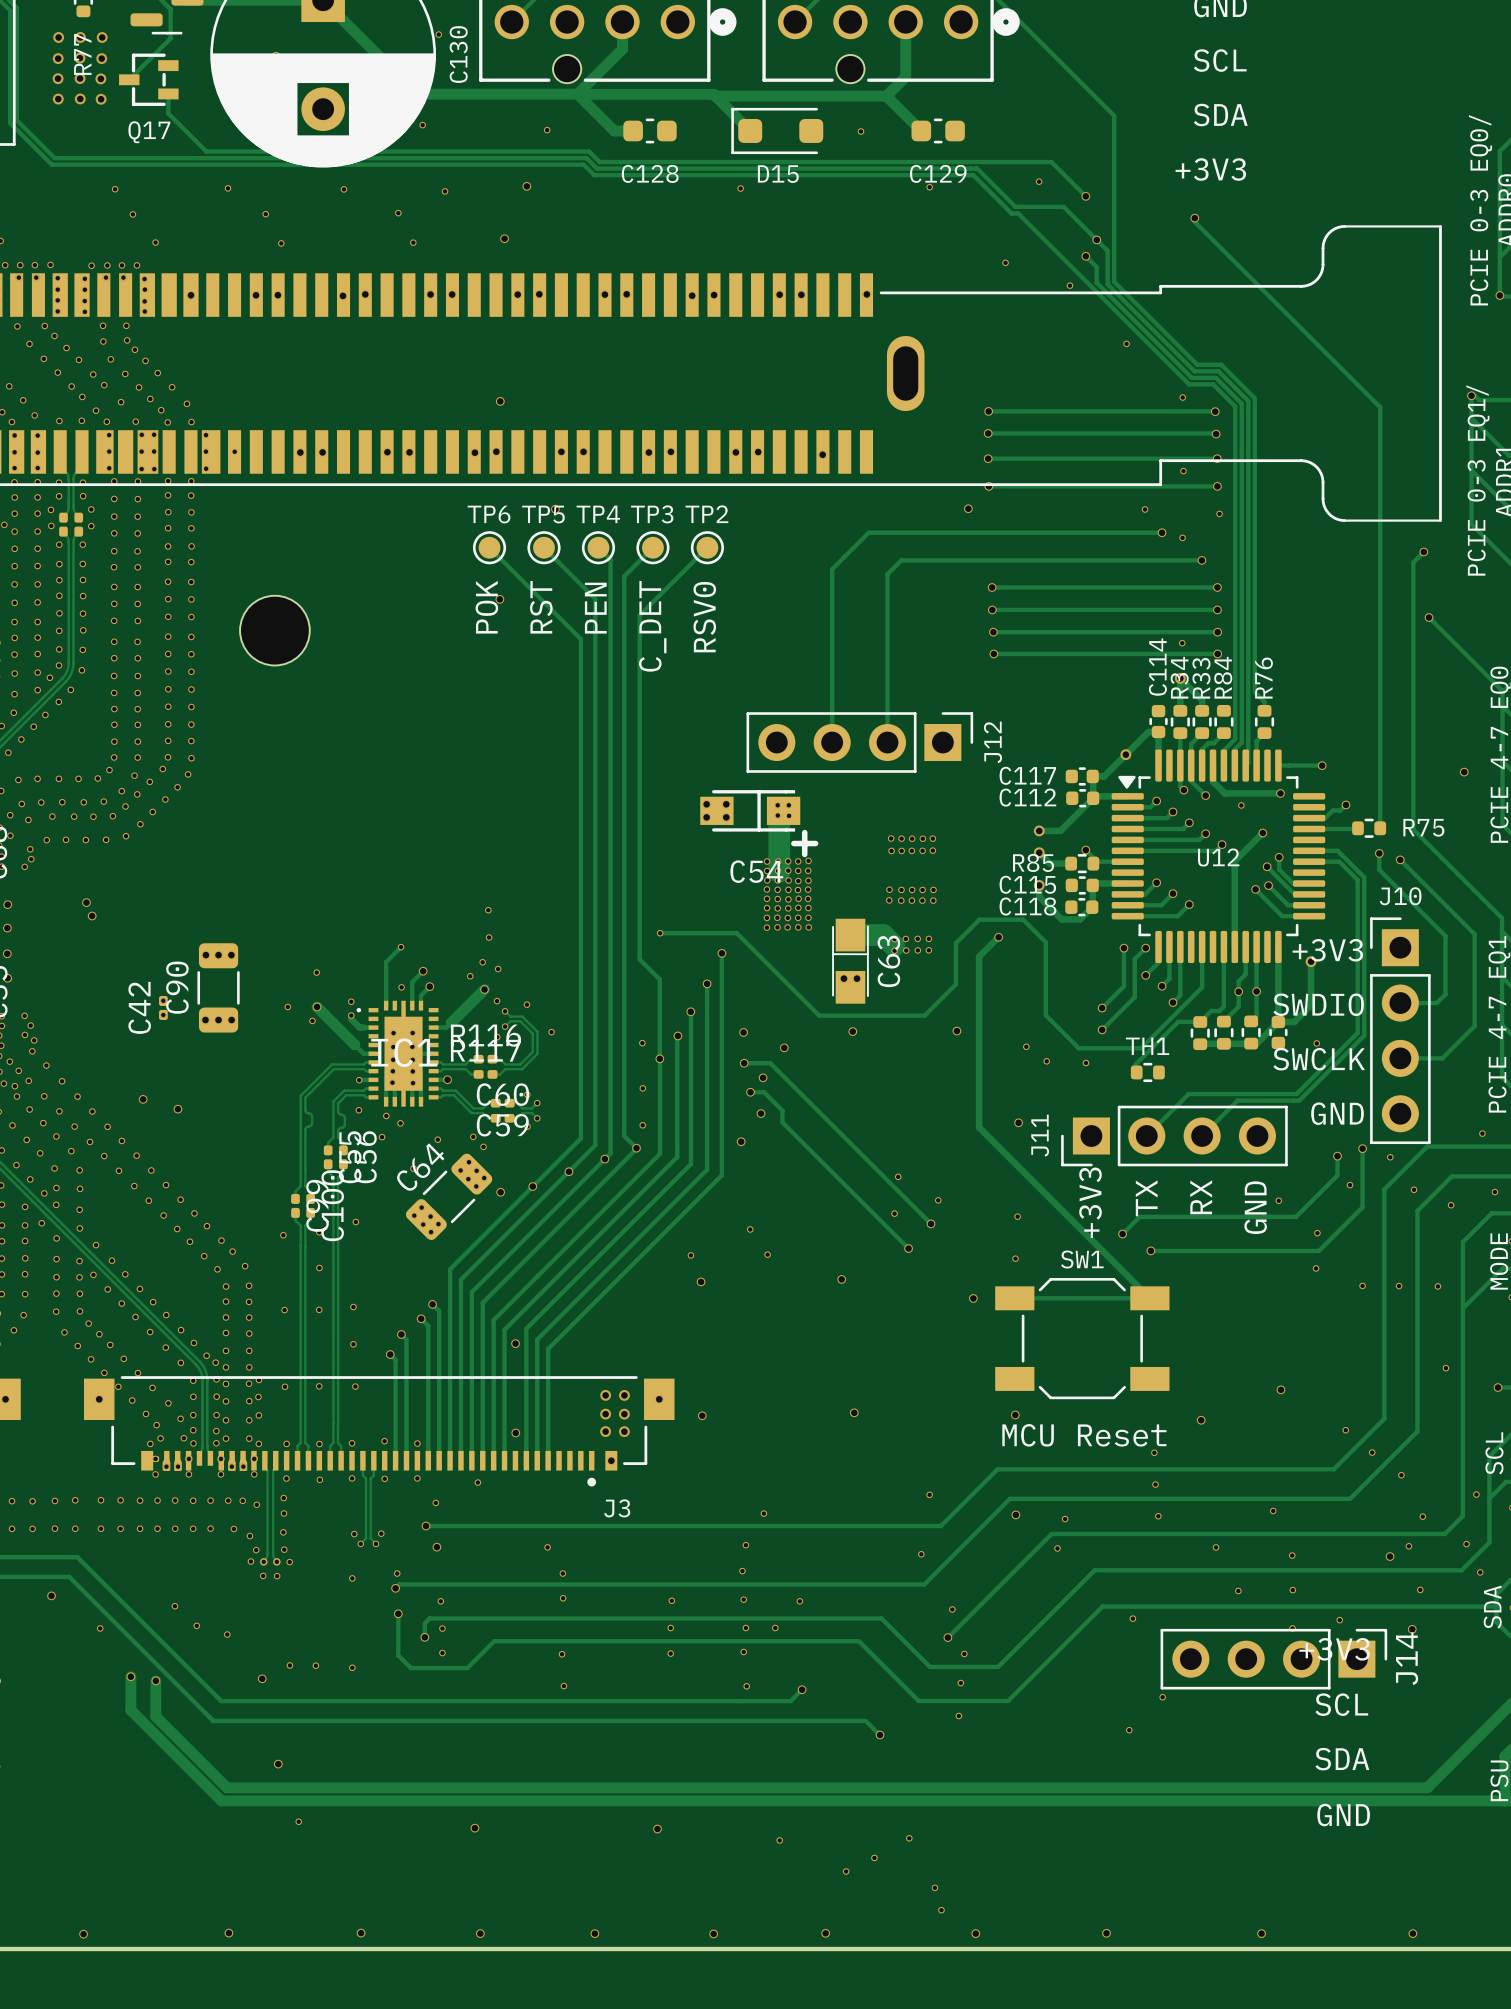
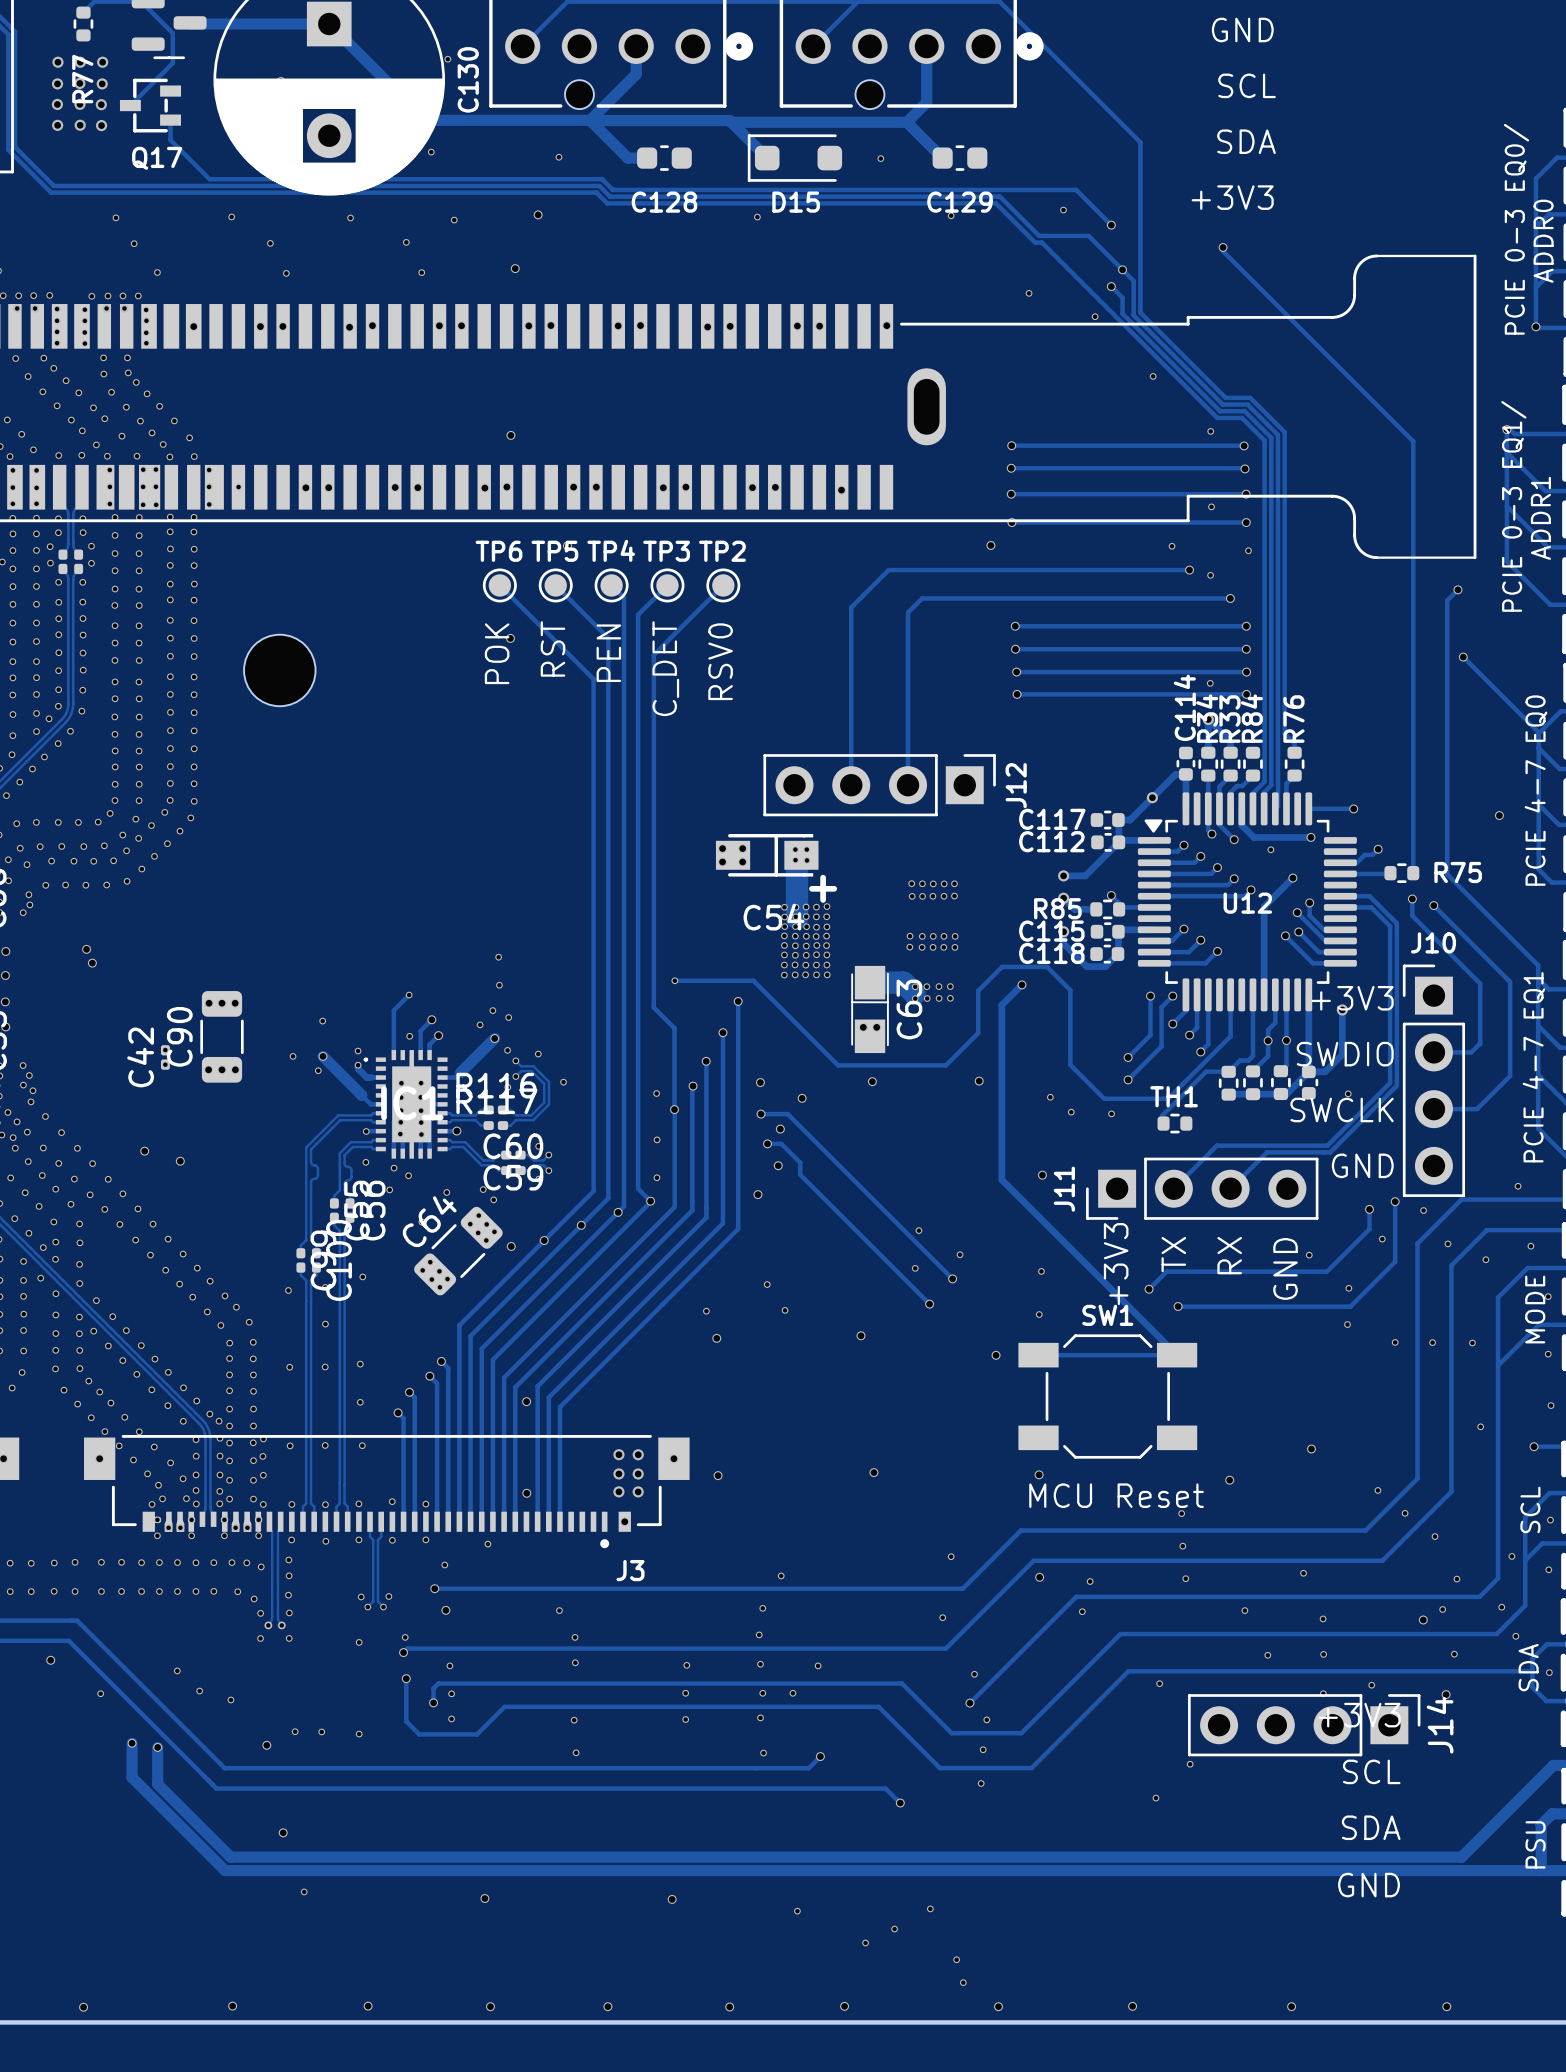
via: (250, 1561) -> none
via: (289, 1562) -> none
via: none -> (260, 1638)
via: none -> (289, 1638)
via: (263, 1575) -> none
via: (277, 1576) -> none

